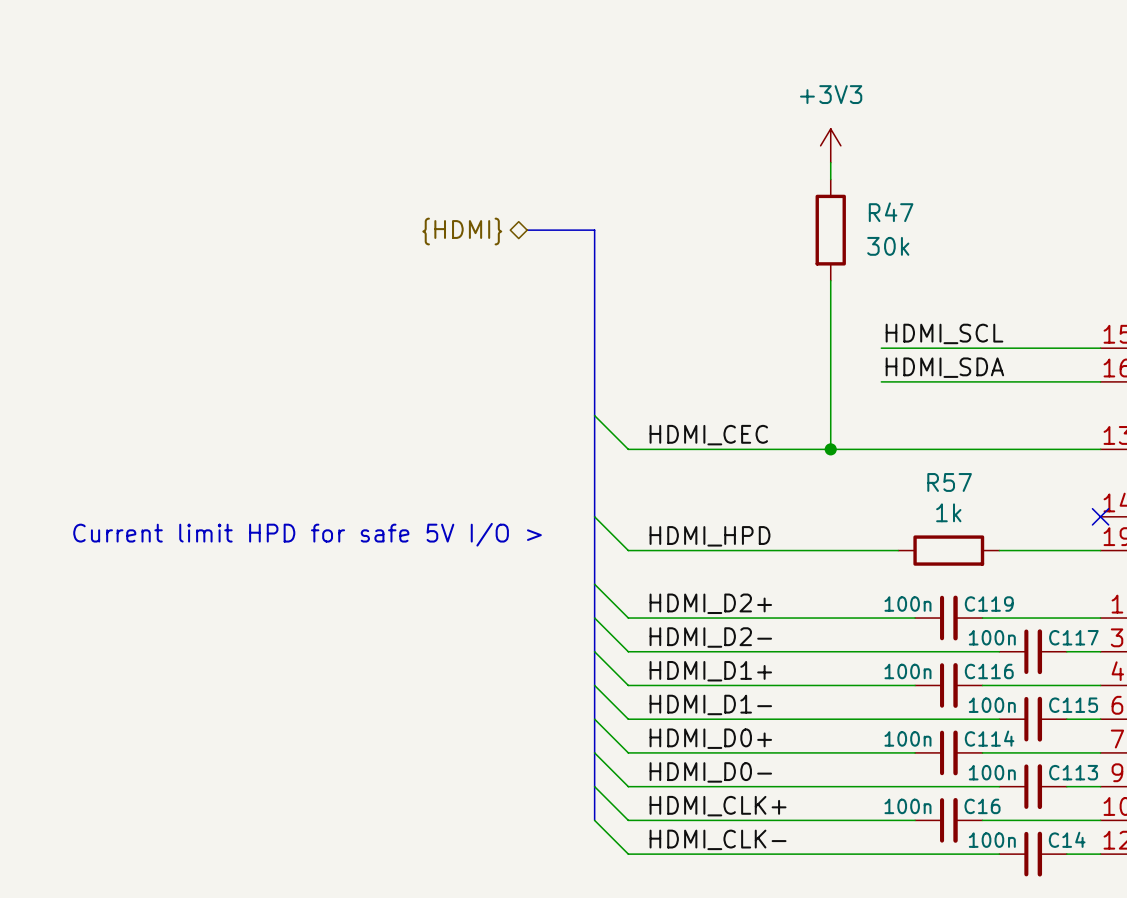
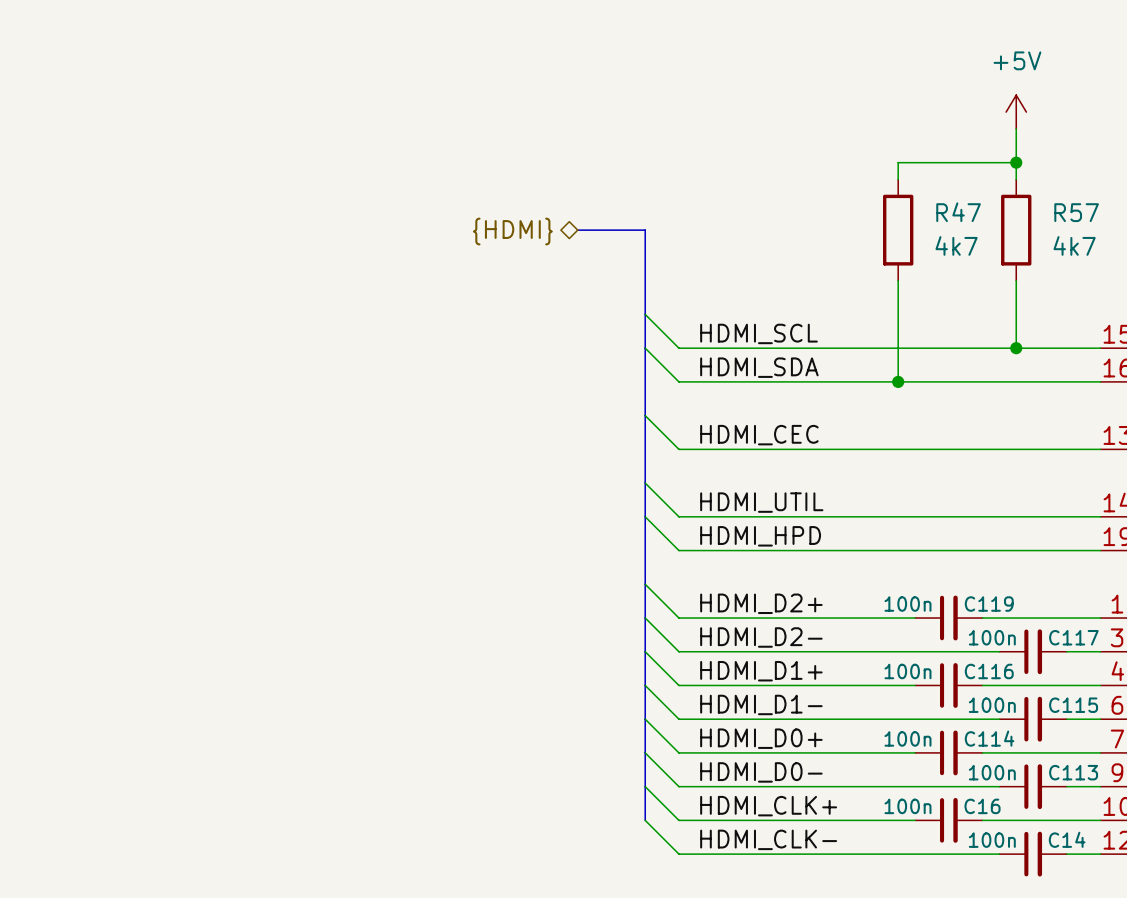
power symbol: none -> +5V (1016, 112)
wire: none -> (1016, 128) (1016, 179)
power symbol: +3V3 (830, 145) -> none
wire: (830, 162) (830, 179) -> none
wire: none -> (1016, 162) (898, 162) (898, 179)
junction: none -> (1016, 162)
bus: (527, 230) (577, 230) -> none
bus: (594, 230) (594, 820) -> (594, 230) (645, 230) (645, 820)
R47 position: (830, 230) -> (898, 230)
hierarchical label position: {HDMI} (462, 231) -> {HDMI} (512, 231)
R47 value: 30k (888, 246) -> 4k7 (956, 245)
wire: (830, 280) (830, 449) -> none
wire: none -> (898, 280) (898, 381)
wire: none -> (1016, 280) (1016, 348)
wire: none -> (645, 314) (678, 348) (881, 348)
label position: HDMI_SCL (944, 333) -> HDMI_SCL (758, 333)
wire: none -> (645, 348) (678, 381) (881, 381)
junction: none -> (1016, 348)
label position: HDMI_SDA (944, 367) -> HDMI_SDA (759, 367)
junction: none -> (898, 381)
wire: (594, 415) (628, 449) (678, 449) -> (645, 415) (678, 449)
label position: HDMI_CEC (708, 435) -> HDMI_CEC (759, 435)
junction: (830, 449) -> none
wire: none -> (645, 483) (678, 516) (1100, 516)
label: none -> HDMI_UTIL (761, 502)
R57 value: 1k (948, 512) -> 4k7 (1074, 245)
wire: (594, 516) (628, 550) (678, 550) -> (645, 516) (678, 550)
no-connect mark: (1100, 516) -> none
text: Current limit HPD for safe 5V I/O > (307, 534) -> none
label position: HDMI_HPD (710, 536) -> HDMI_HPD (760, 536)
wire: none -> (898, 550) (999, 550)
R57 rotation: 0° (948, 550) -> 90° clockwise (1016, 230)
R57 position: (948, 550) -> (1016, 230)
wire: (594, 584) (628, 618) (678, 618) -> (645, 584) (678, 618)
label position: HDMI_D2+ (710, 603) -> HDMI_D2+ (761, 603)
wire: (594, 618) (628, 651) (678, 651) -> (645, 618) (678, 651)
label position: HDMI_D2- (710, 637) -> HDMI_D2- (761, 637)
wire: (594, 651) (628, 685) (678, 685) -> (645, 651) (678, 685)
label position: HDMI_D1+ (710, 671) -> HDMI_D1+ (761, 671)
wire: (594, 685) (628, 719) (678, 719) -> (645, 685) (678, 719)
label position: HDMI_D1- (710, 704) -> HDMI_D1- (761, 704)
wire: (594, 719) (628, 752) (678, 752) -> (645, 719) (678, 752)
label position: HDMI_D0+ (710, 738) -> HDMI_D0+ (761, 738)
wire: (594, 752) (628, 786) (678, 786) -> (645, 752) (678, 786)
label position: HDMI_D0- (710, 772) -> HDMI_D0- (761, 772)
wire: (594, 786) (628, 820) (678, 820) -> (645, 786) (678, 820)
label position: HDMI_CLK+ (718, 806) -> HDMI_CLK+ (768, 806)
wire: (594, 820) (628, 854) (678, 854) -> (645, 820) (678, 854)
label position: HDMI_CLK- (718, 839) -> HDMI_CLK- (768, 839)

